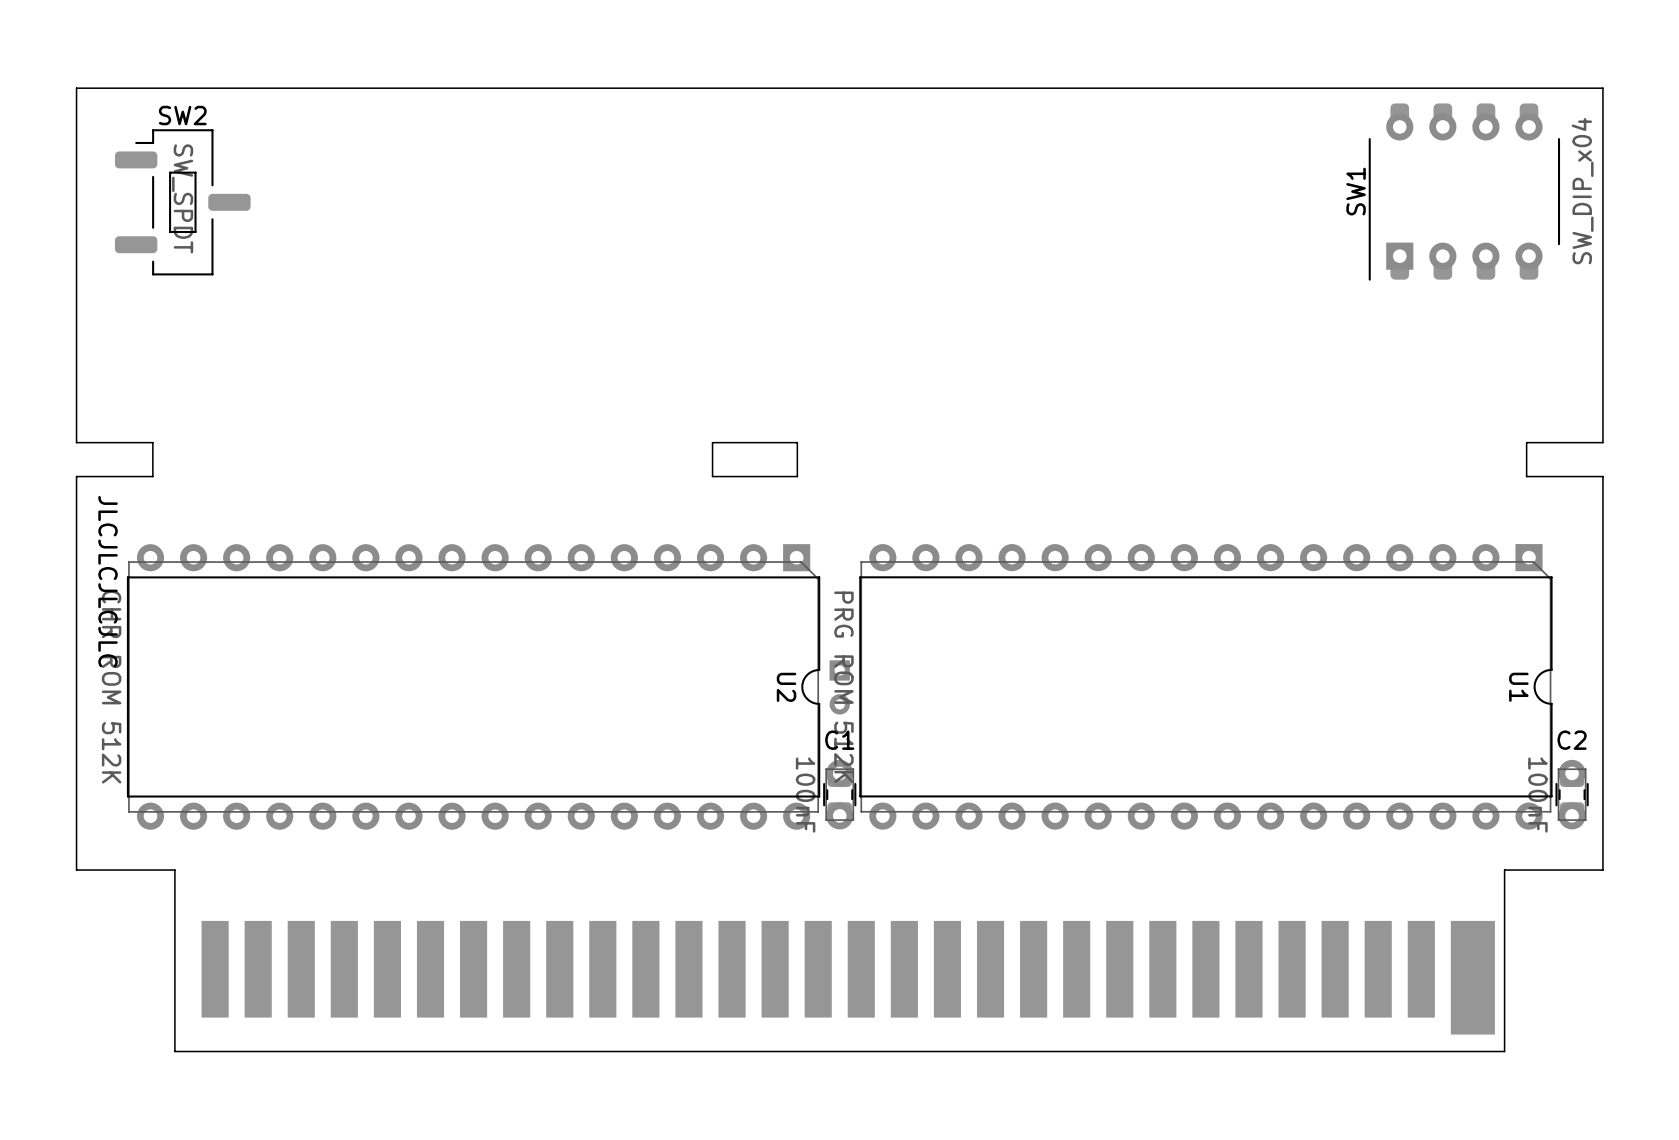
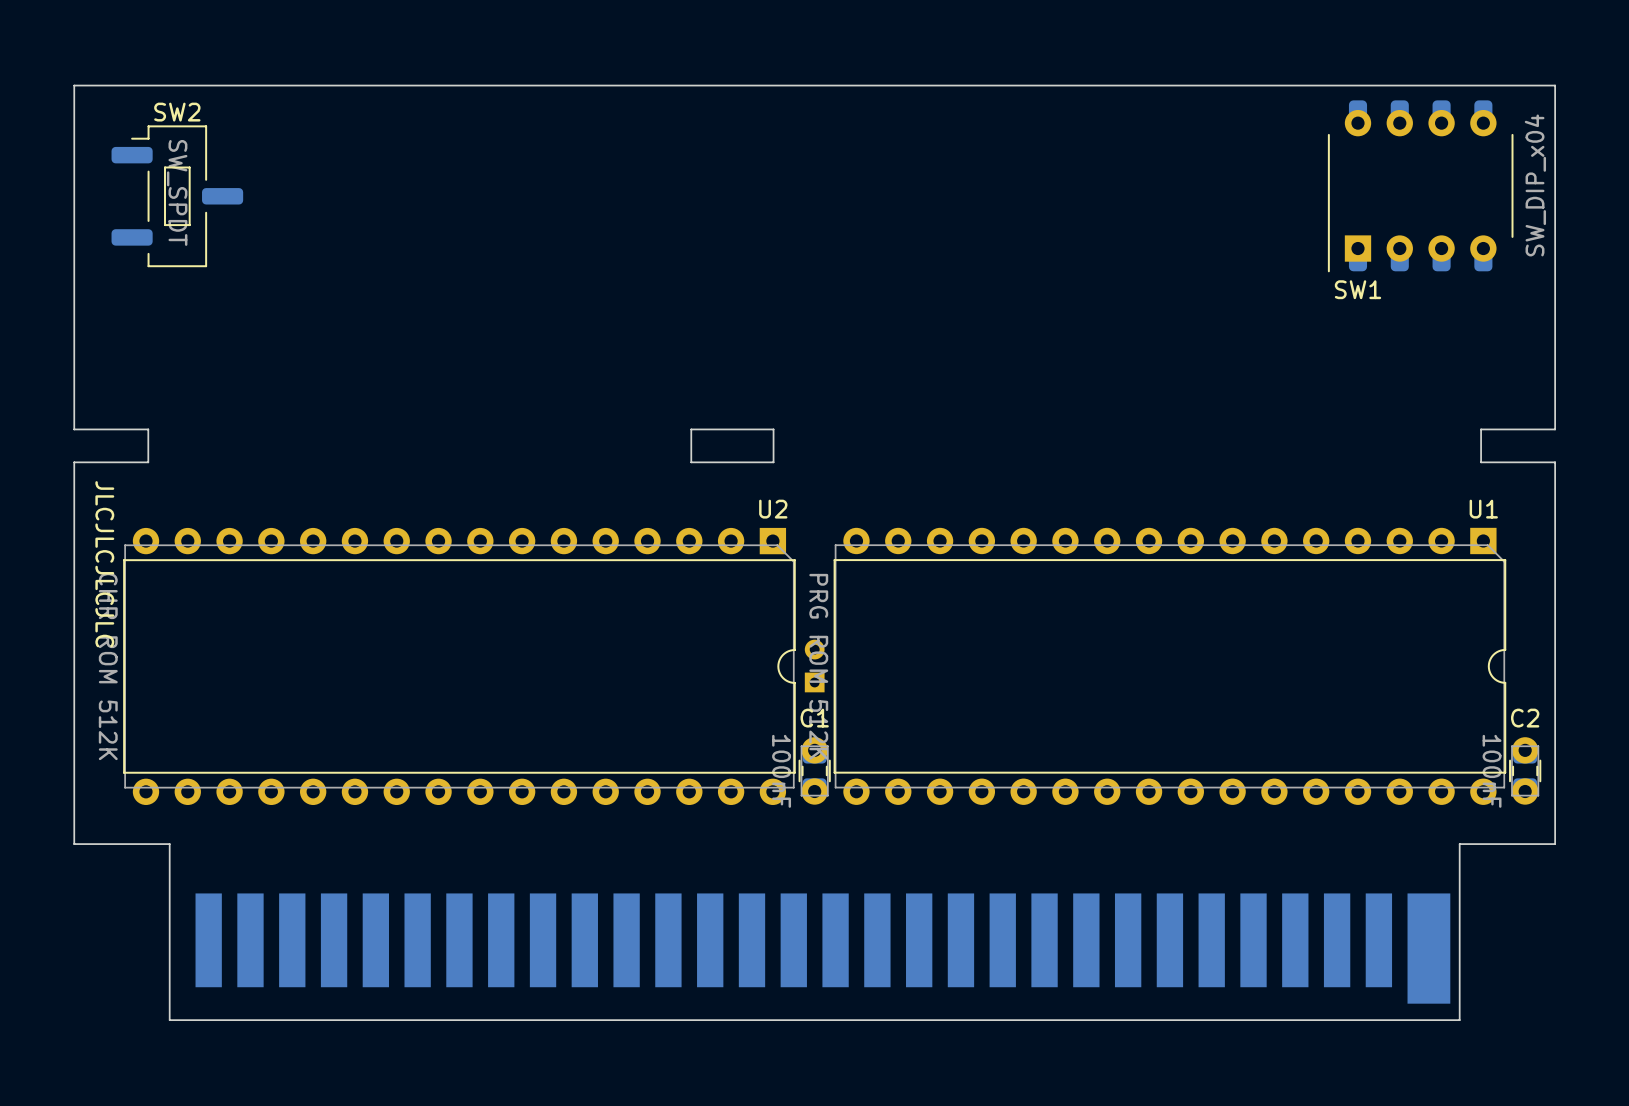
SW1 name rotation: 0° (1356, 191) -> 90° clockwise (1357, 289)
SW1 name position: SW1 (1356, 191) -> SW1 (1357, 289)
U2 name rotation: 0° (786, 687) -> 90° counterclockwise (773, 509)
U2 name position: U2 (786, 687) -> U2 (773, 509)
part rotation: 0° (839, 687) -> 180° (814, 666)
U1 name rotation: 0° (1518, 687) -> 90° counterclockwise (1483, 509)
U1 name position: U1 (1518, 687) -> U1 (1483, 509)

